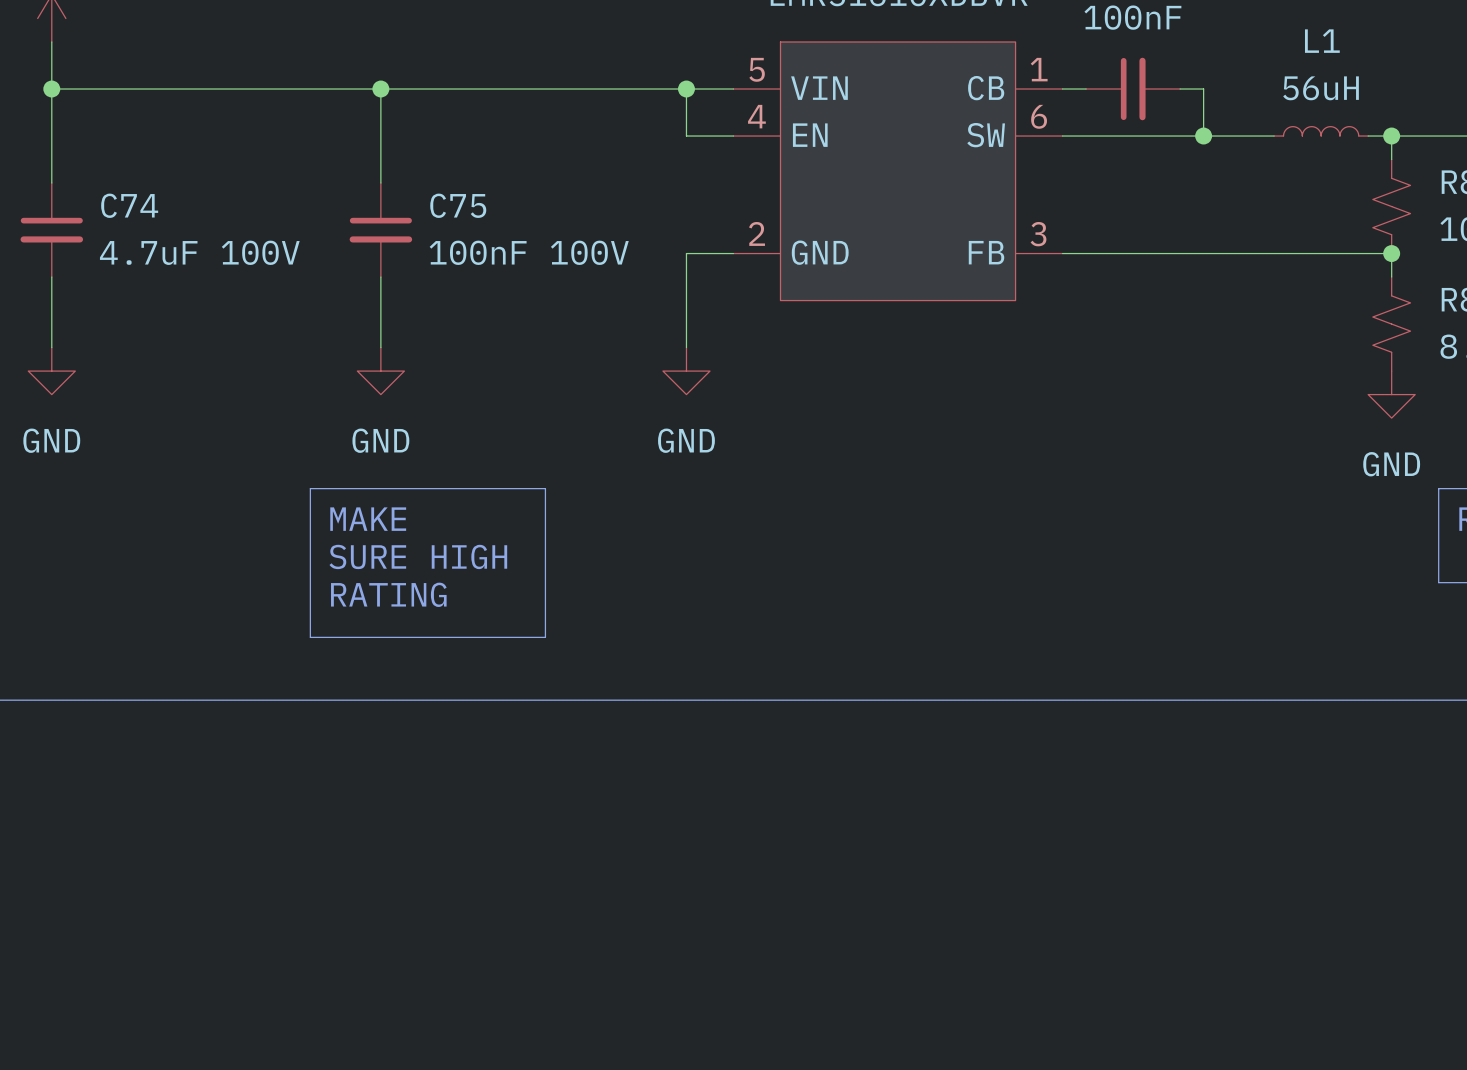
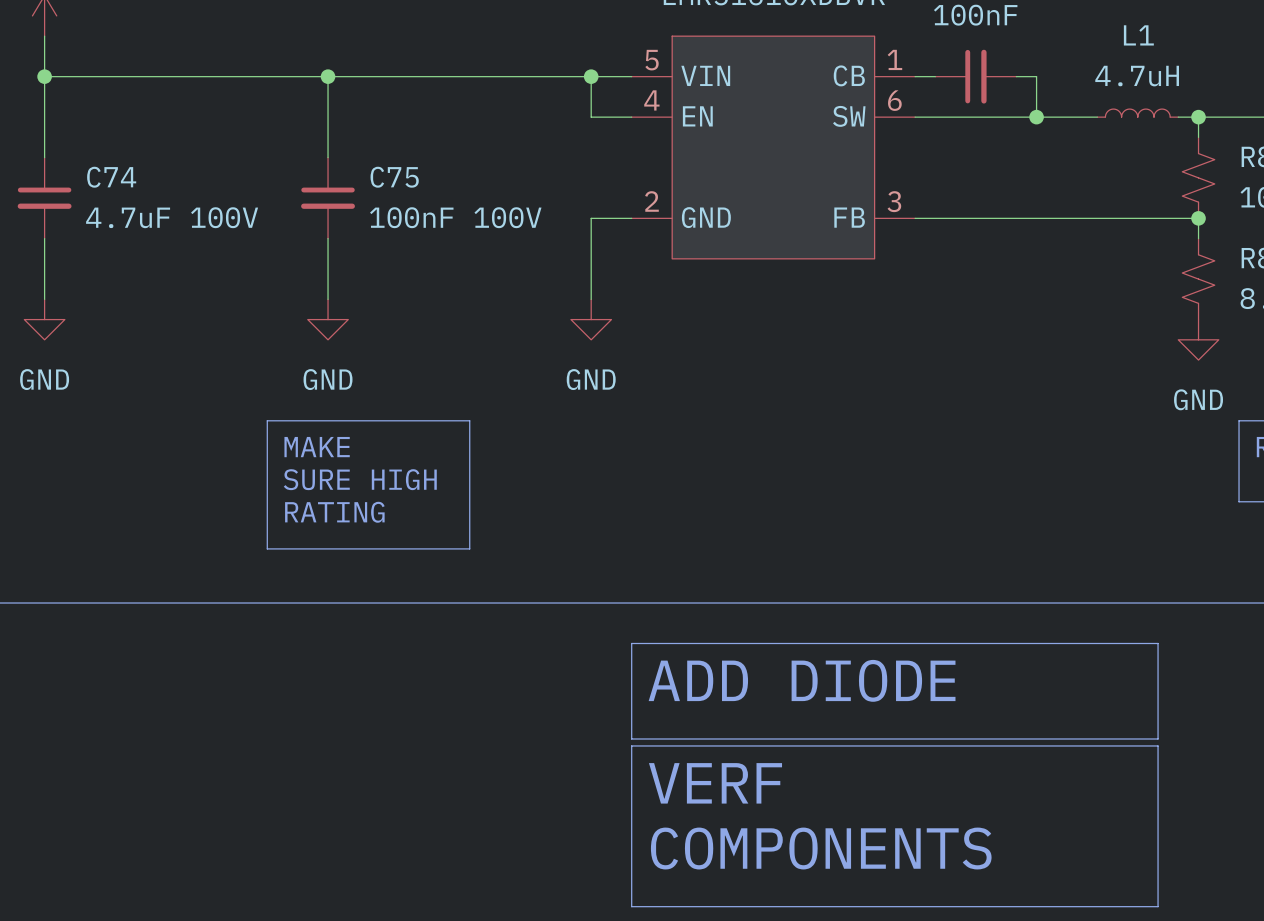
L1 value: 56uH (1321, 88) -> 4.7uH (1137, 76)
line: none -> (631, 643) (631, 738) (1158, 738) (1158, 643) (631, 643)
text: none -> ADD DIODE (802, 680)
line: none -> (631, 745) (1158, 745) (1158, 906) (631, 906) (631, 745)
text: none -> VERF (715, 783)
text: none -> COMPONENTS (821, 848)

